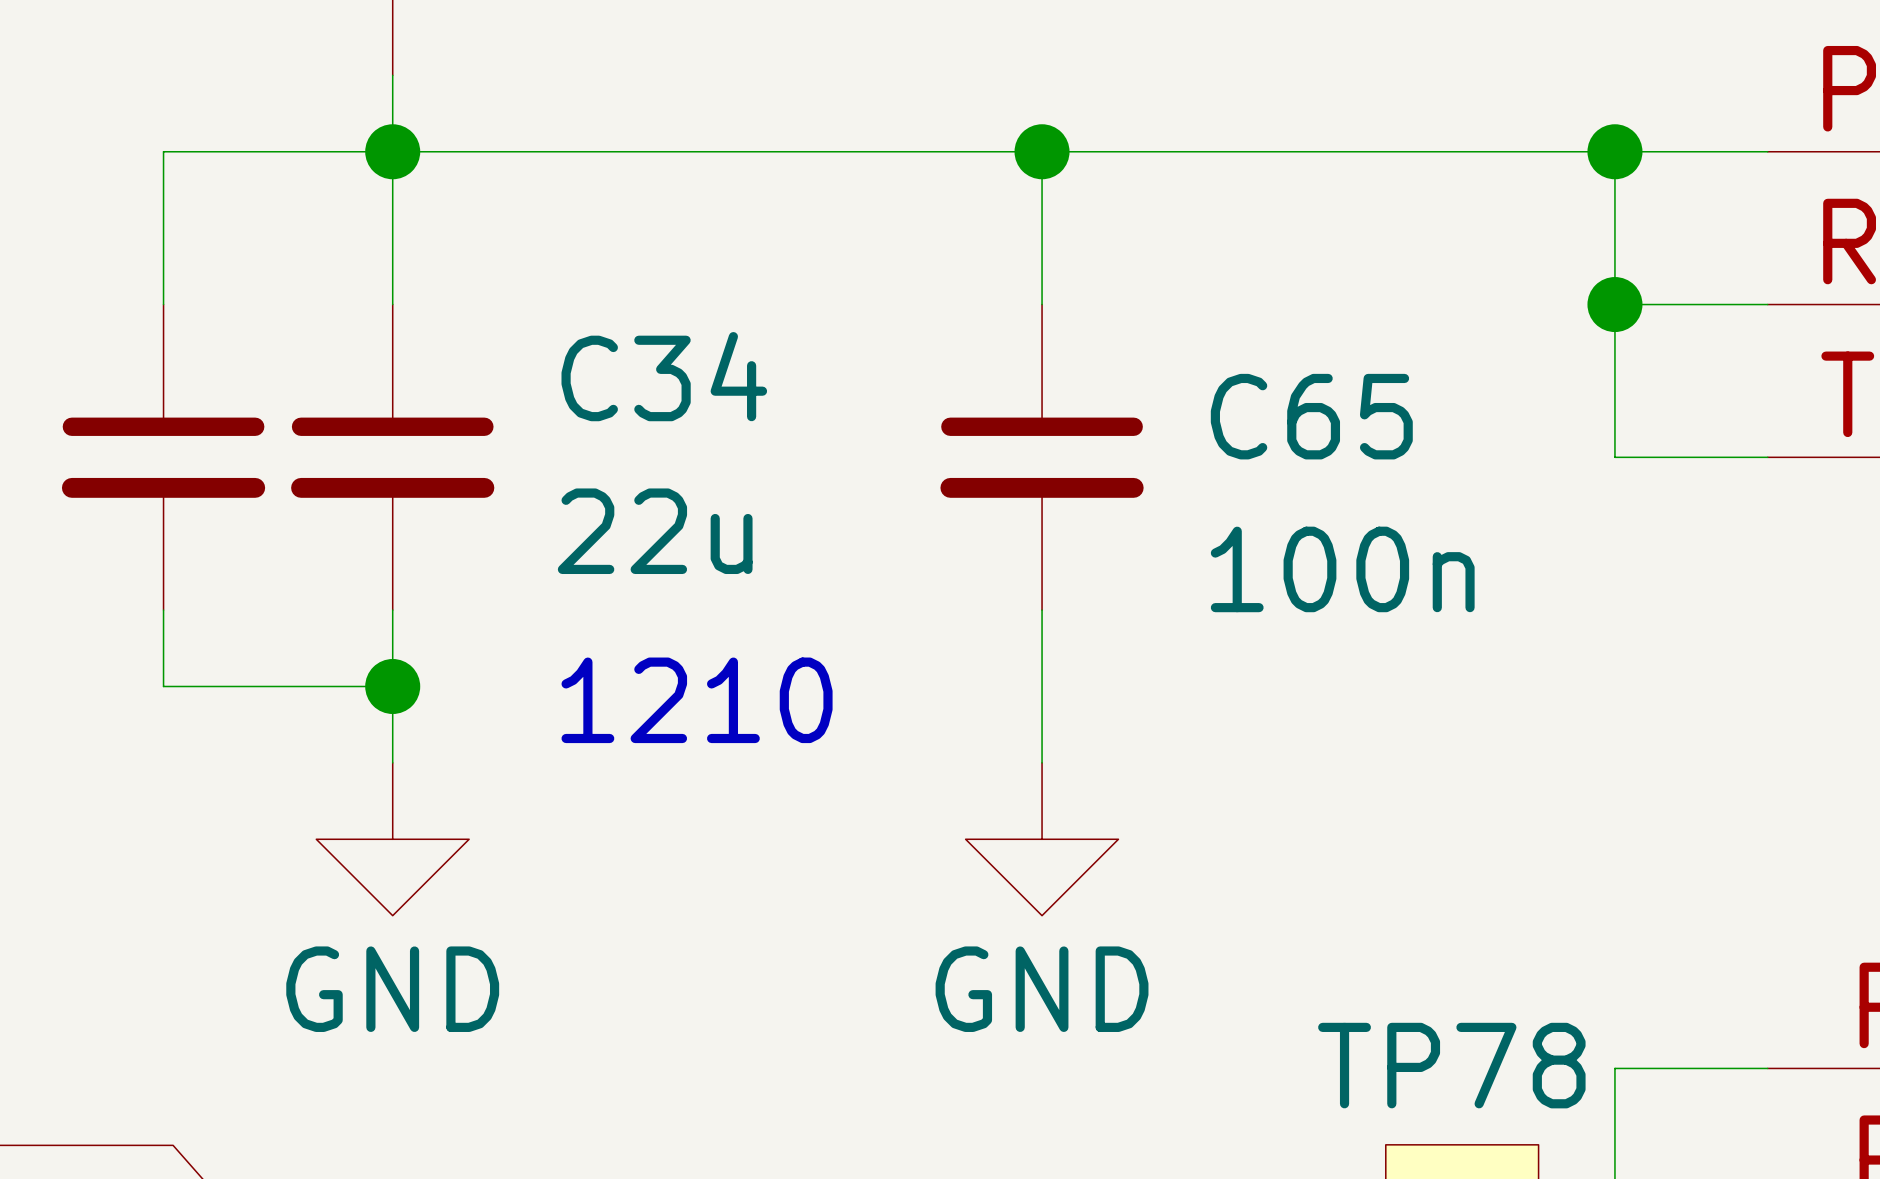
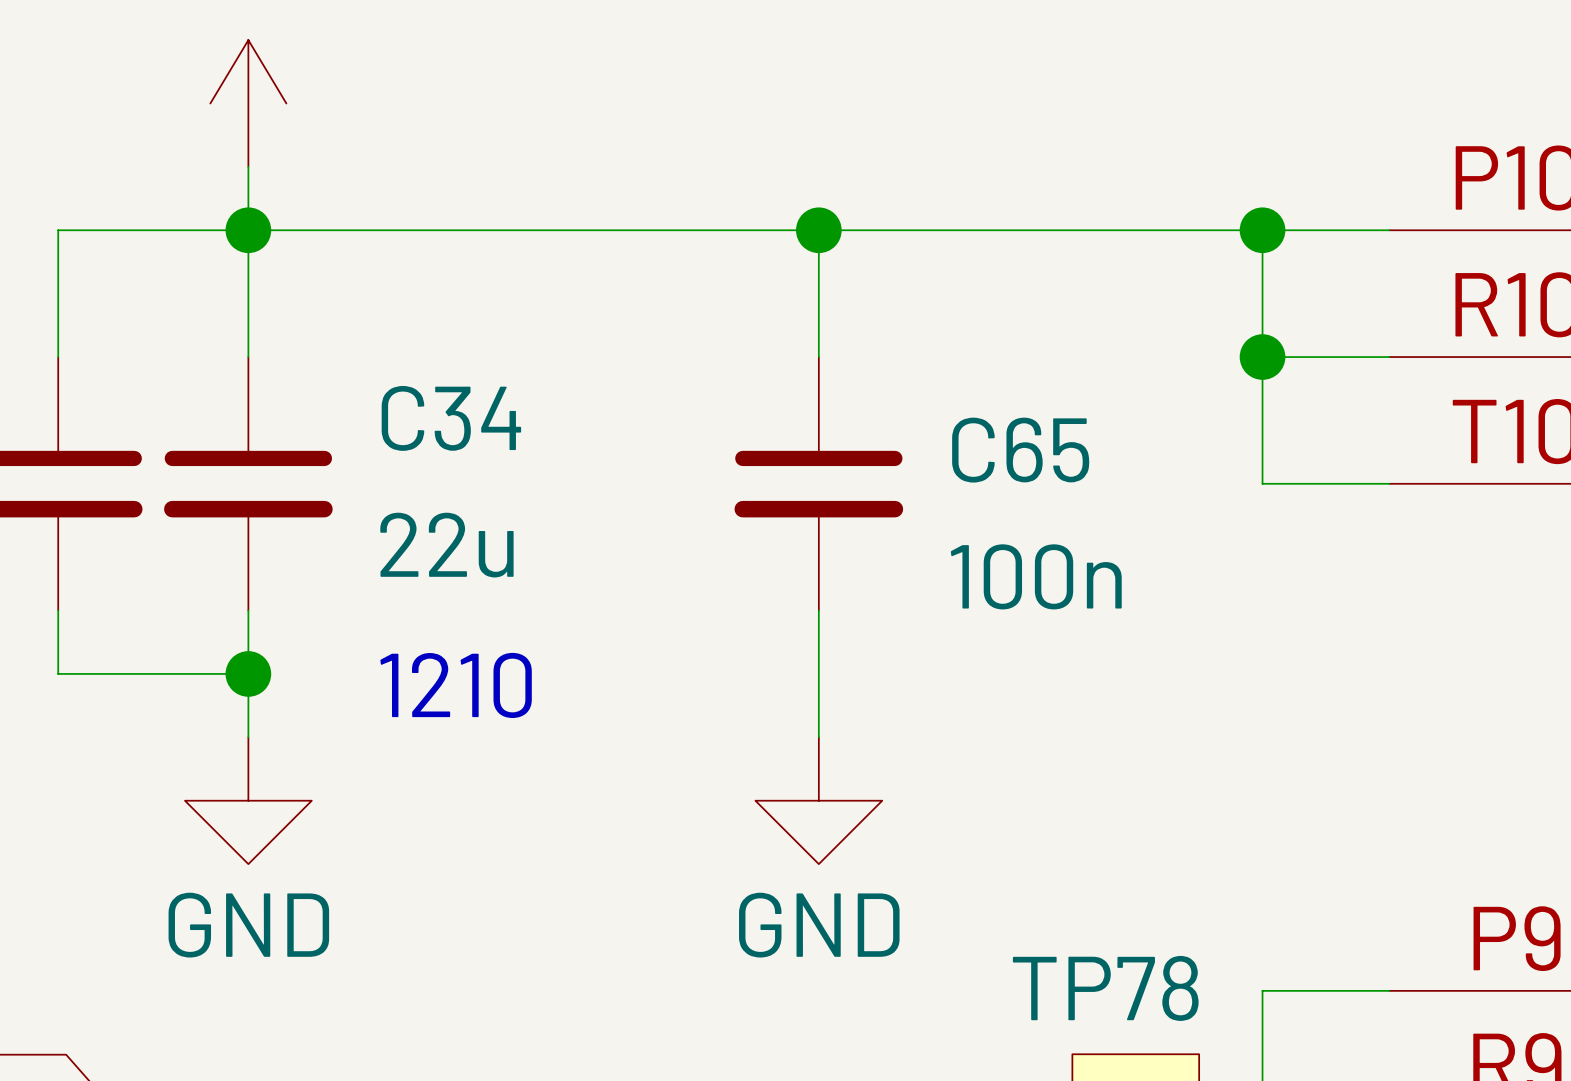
wire: (1042, 151) (1042, 304) -> (818, 230) (818, 357)
junction position: (1042, 151) -> (818, 230)
C65 position: (1042, 457) -> (818, 483)
wire: (1042, 610) (1042, 762) -> (818, 610) (818, 737)
power symbol position: GND (1042, 839) -> GND (818, 800)

